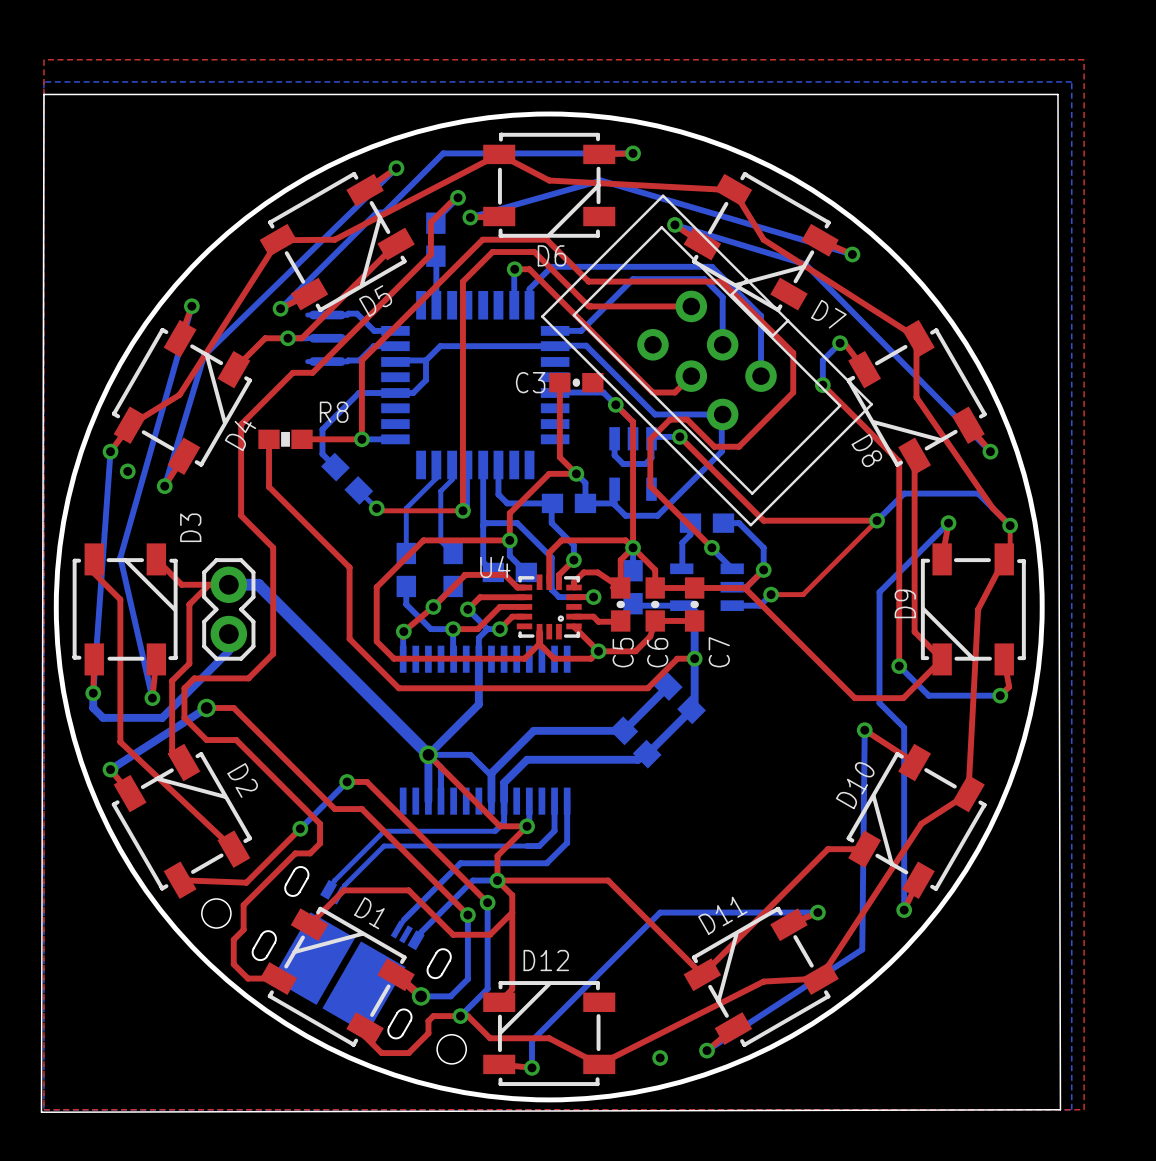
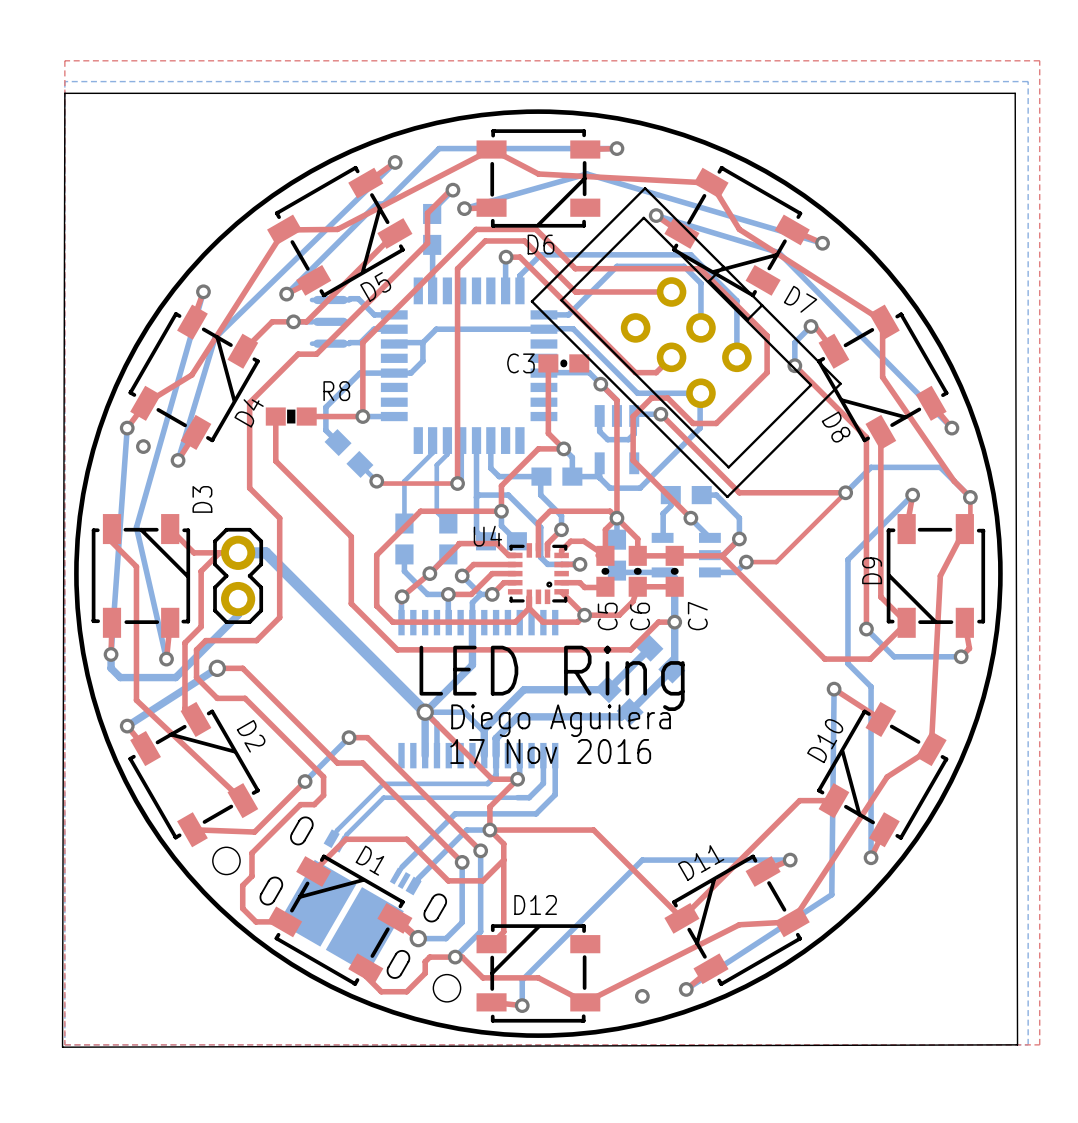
text: none -> LED Ring (552, 678)
text: none -> Diego Aguilera (561, 720)
text: none -> 17 Nov 2016 (550, 751)

